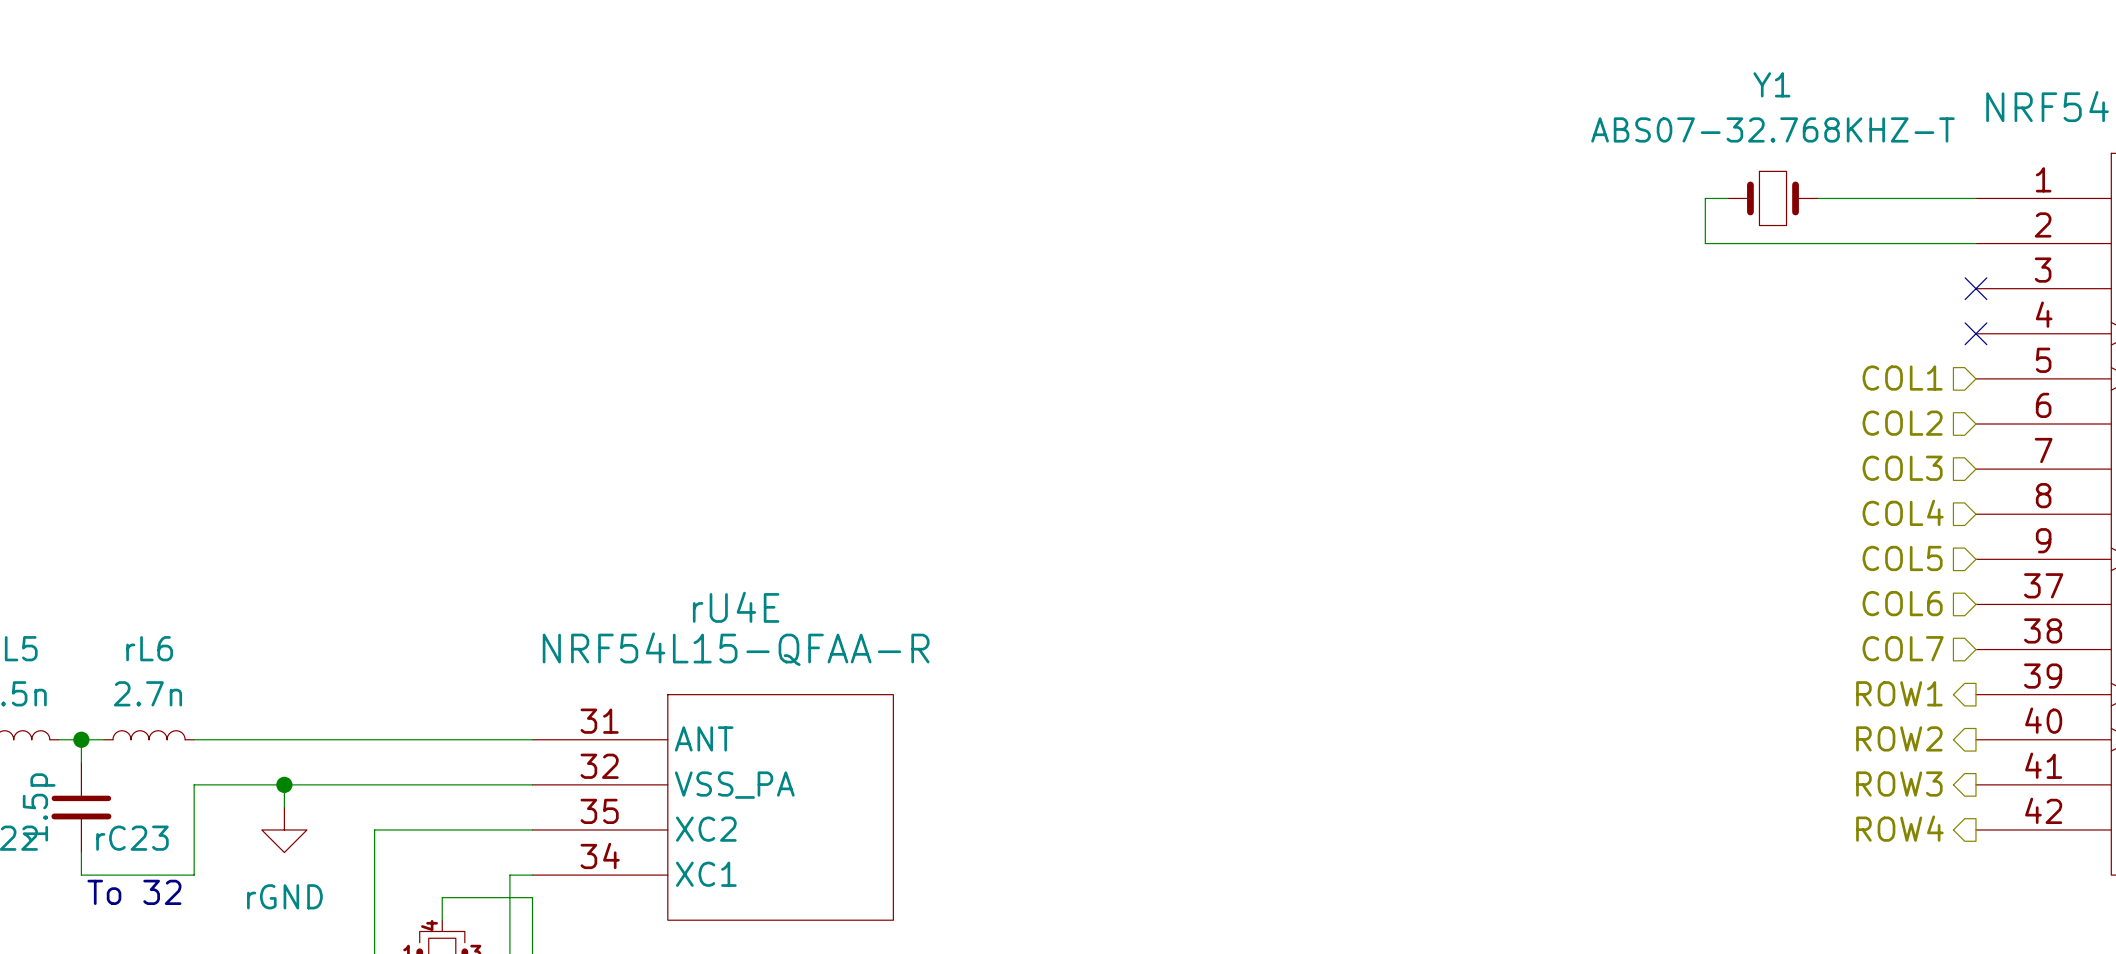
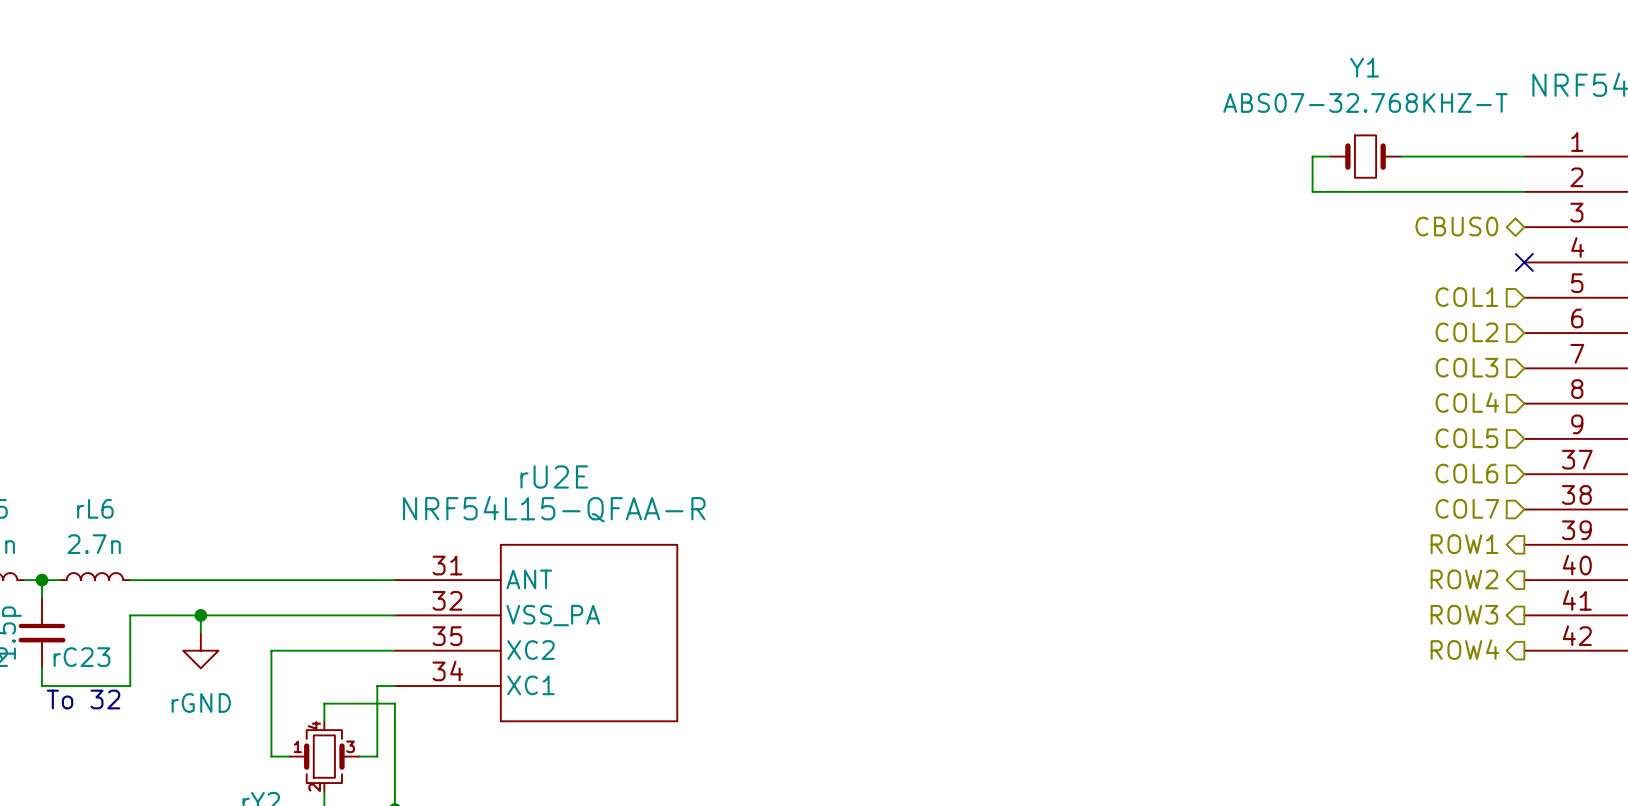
hierarchical label: none -> CBUS0 (1456, 226)
no-connect mark: (1975, 288) -> none
rU4E name: rU4E (736, 607) -> rU2E (554, 476)

